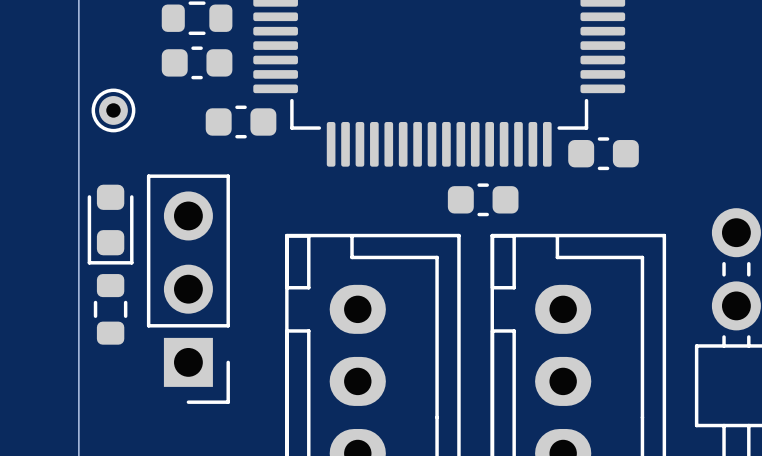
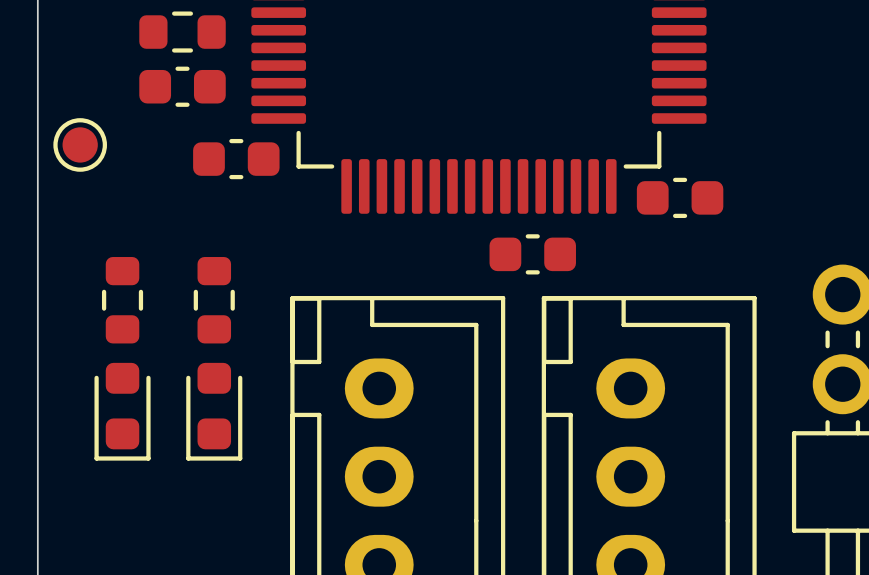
part footprint: [91, 88, 136, 133] -> [53, 118, 108, 172]
part: (110, 224) -> none
part: none -> (122, 300)
part: none -> (214, 300)
part: (188, 289) -> none
part: (110, 309) -> none
part: none -> (122, 411)
part: none -> (214, 411)

